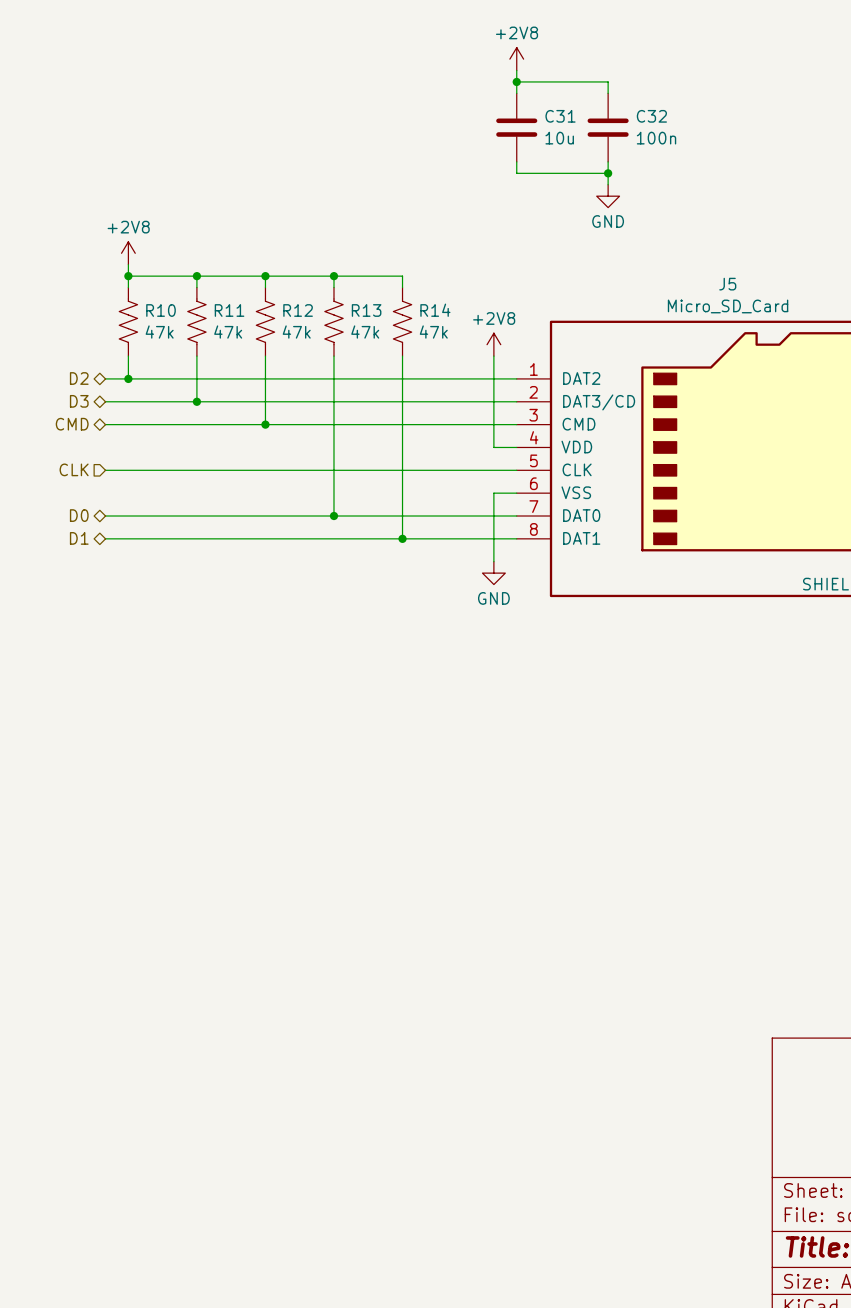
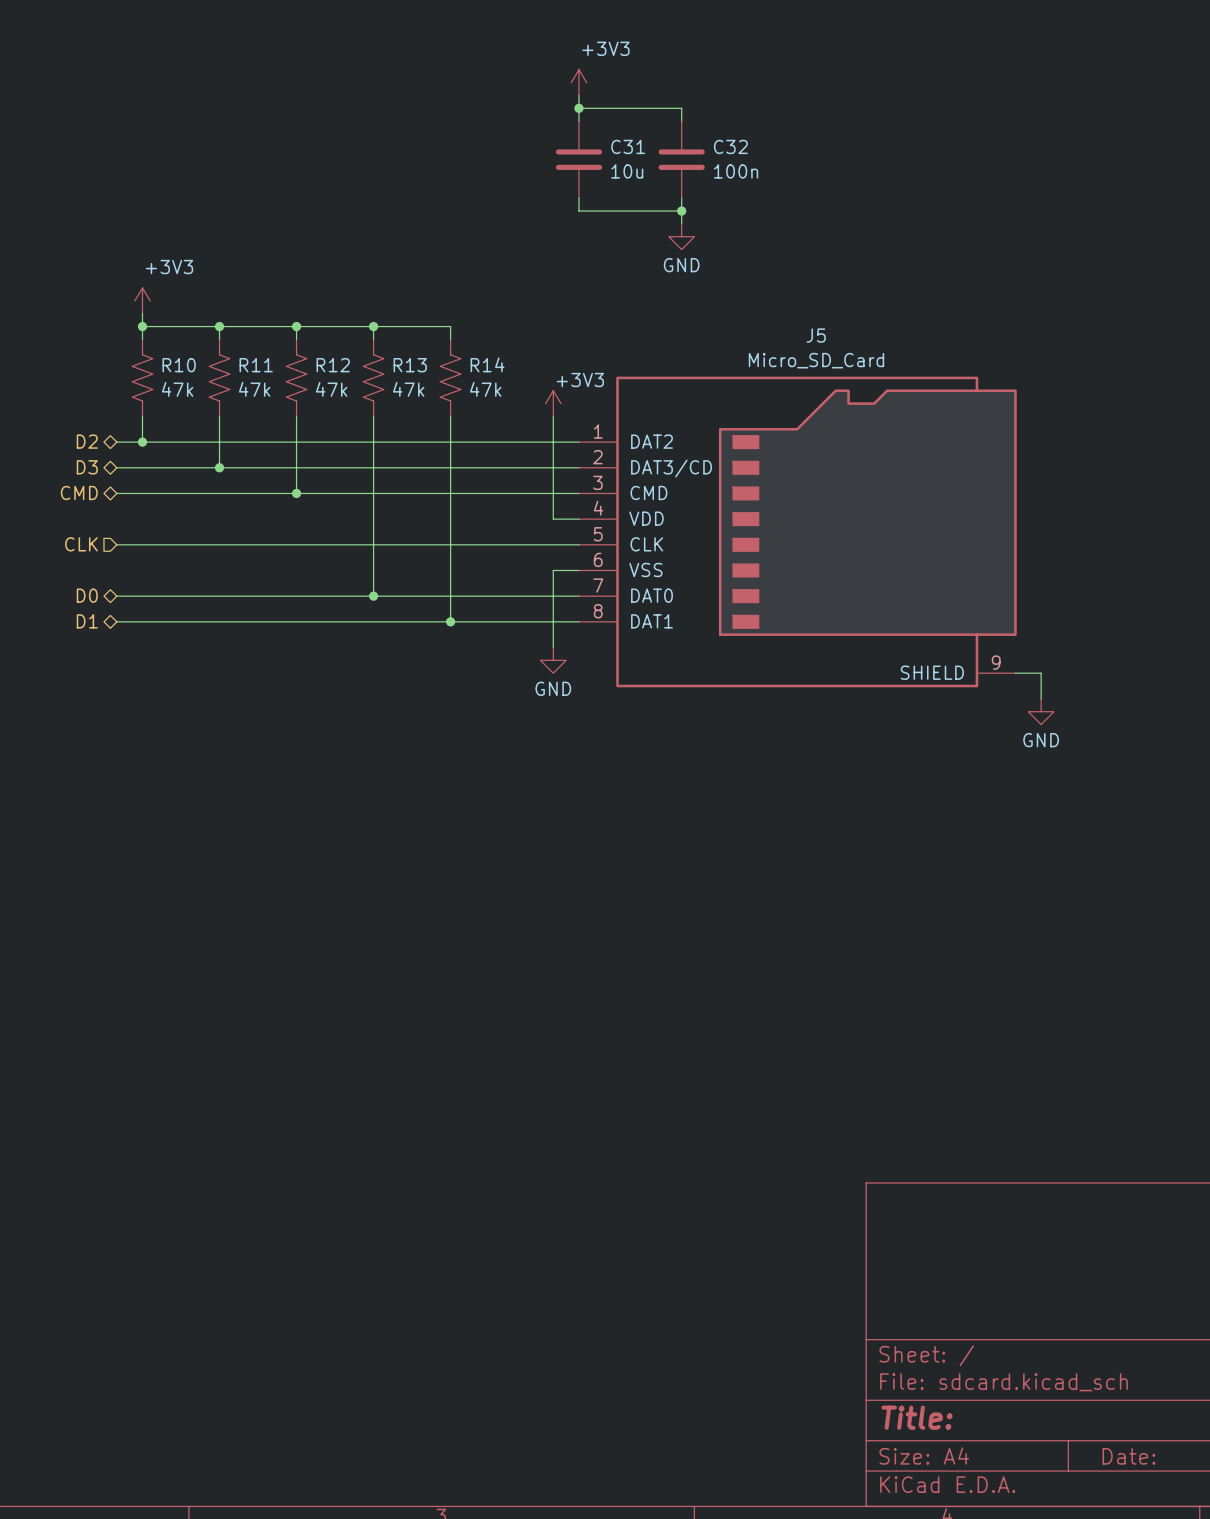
power symbol: +2V8 (516, 59) -> +3V3 (578, 82)
power symbol: +2V8 (128, 253) -> +3V3 (142, 300)
power symbol: +2V8 (493, 344) -> +3V3 (553, 403)

